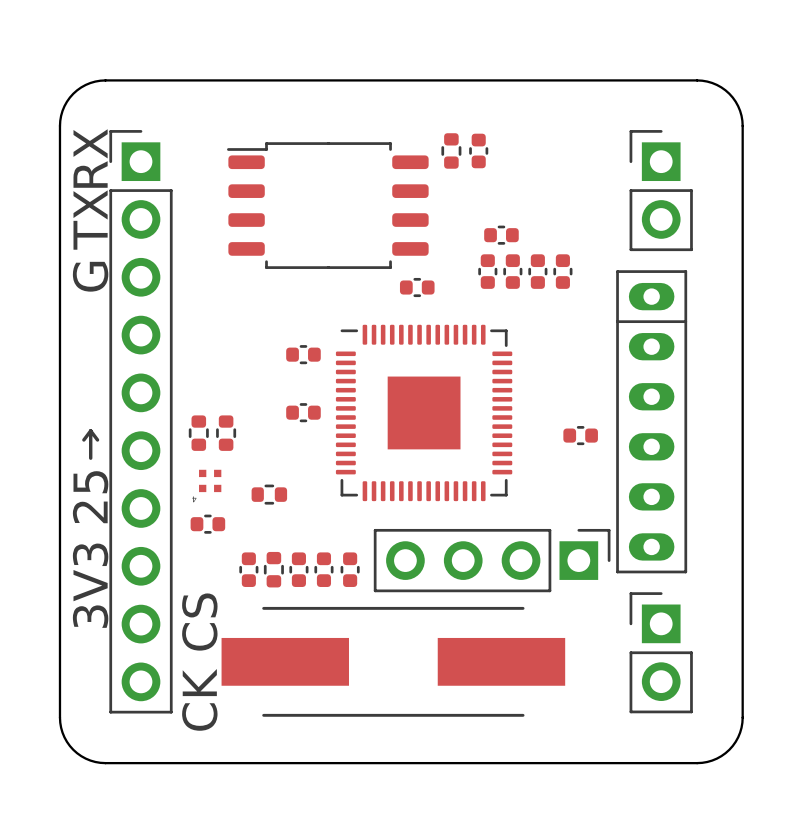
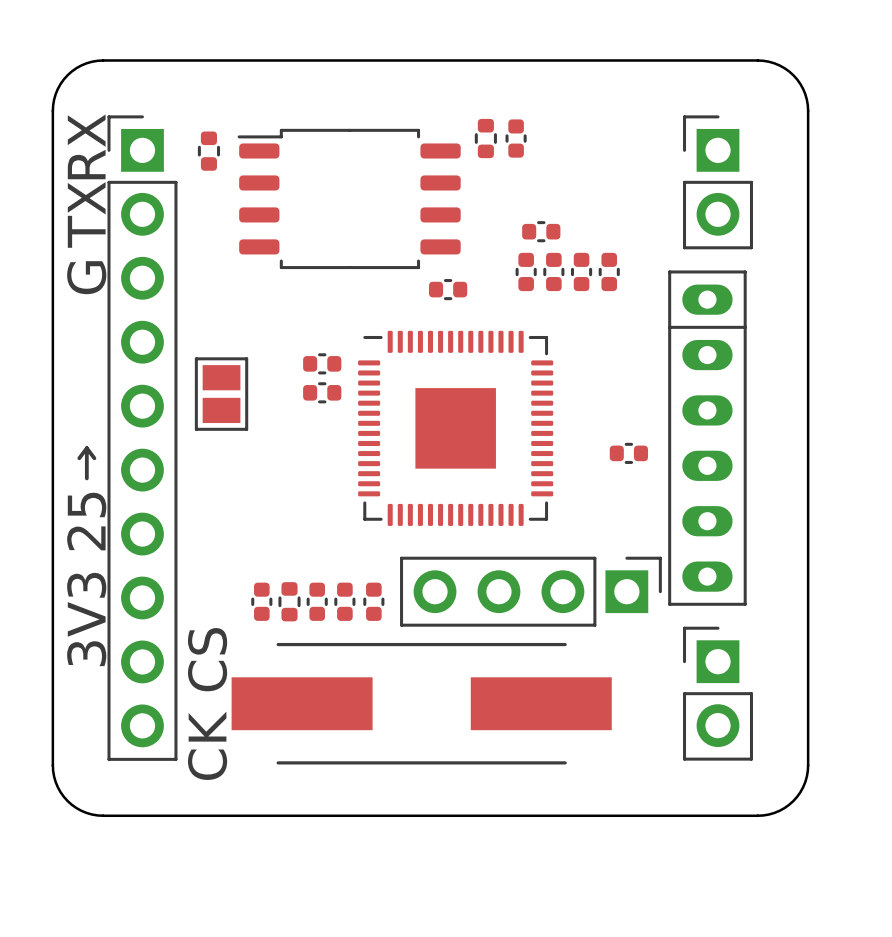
part: none -> (208, 151)
part: none -> (221, 394)
part position: (303, 412) -> (322, 392)
part: (198, 433) -> none
part: (226, 433) -> none
part: (210, 480) -> none
part: (269, 494) -> none
part: (207, 524) -> none

